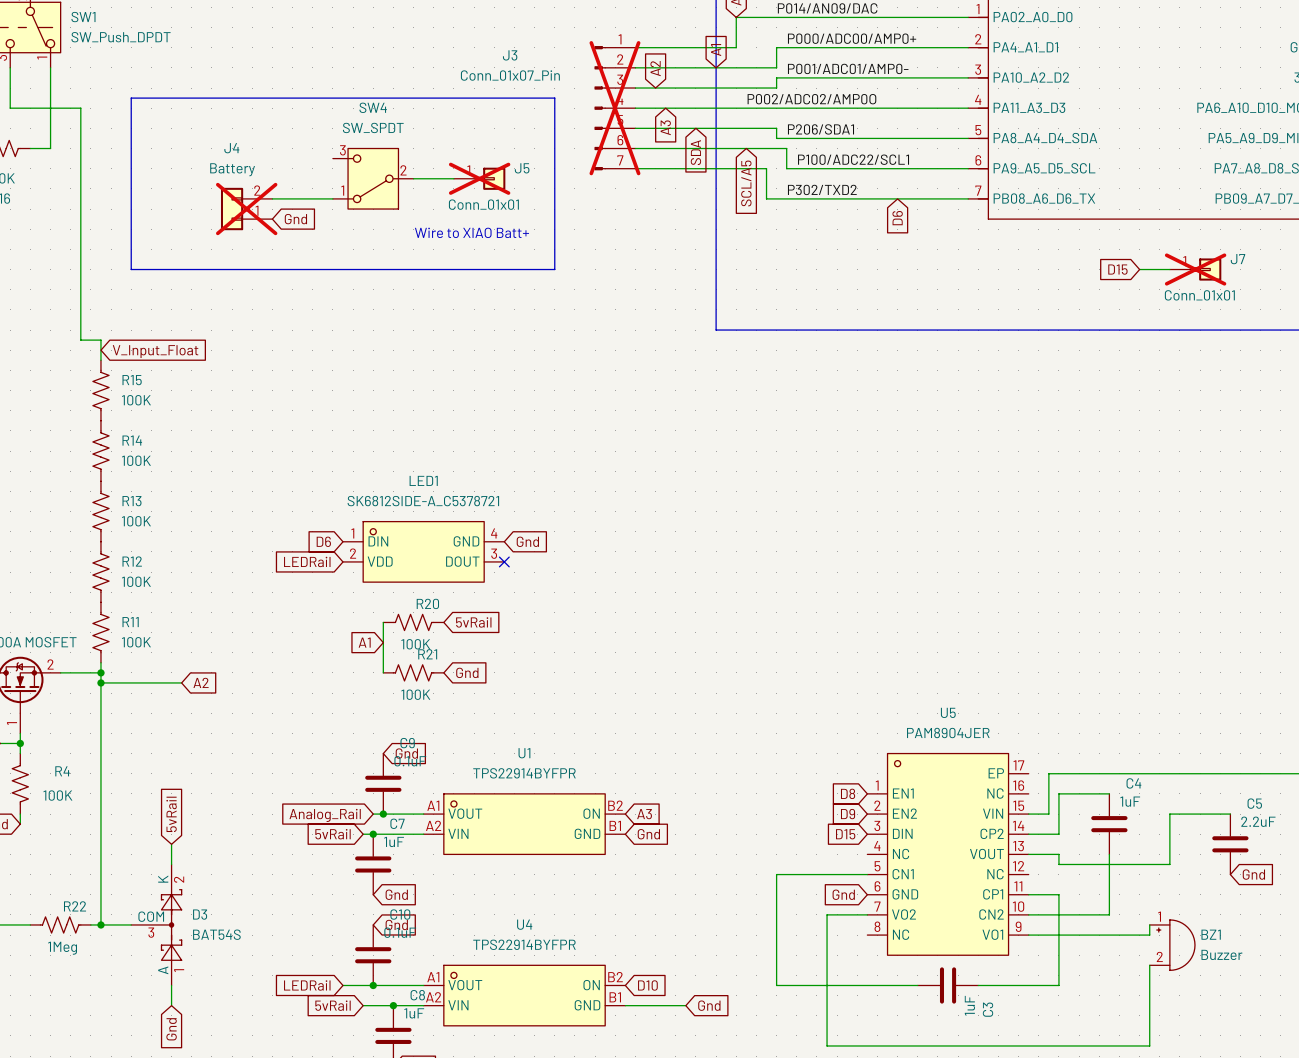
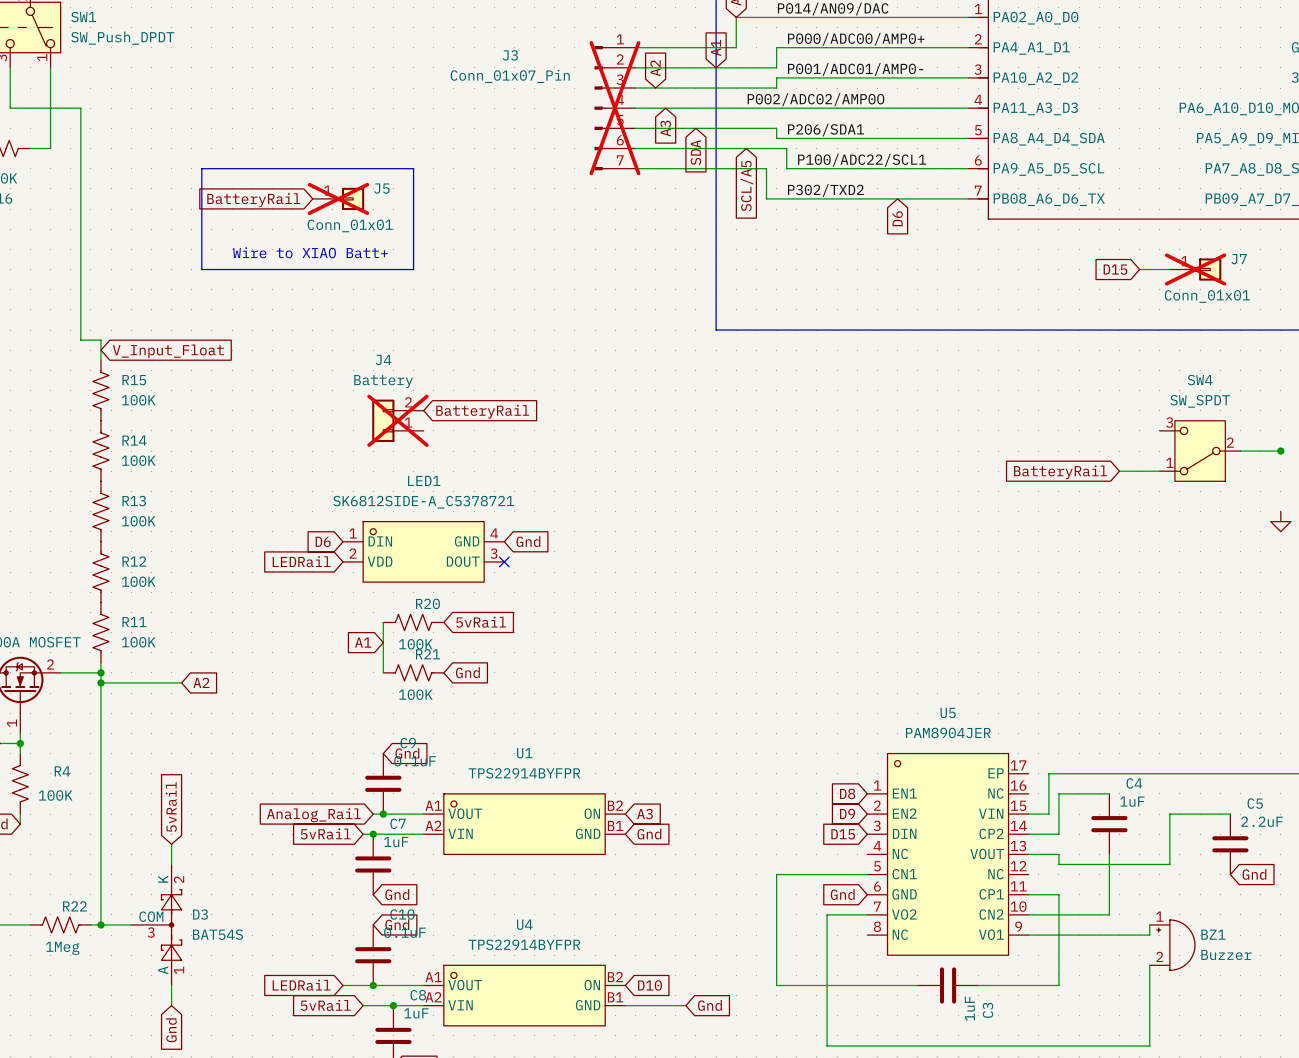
SW4 position: (373, 178) -> (1200, 451)
wire: (413, 178) (453, 178) -> none
J5 position: (479, 178) -> (338, 198)
wire: (272, 198) (332, 198) -> none
global label: none -> BatteryRail (253, 200)
J4 position: (246, 209) -> (397, 420)
global label: Gnd (295, 219) -> none
text position: Wire to XIAO Batt+ (471, 232) -> Wire to XIAO Batt+ (310, 252)
line: (201, 269) (131, 269) (131, 98) (554, 98) (554, 269) (413, 269) -> (201, 269) (201, 168) (413, 168) (413, 269)
global label: none -> BatteryRail (482, 411)
wire: none -> (1240, 451) (1280, 451)
junction: none -> (1280, 451)
wire: none -> (1119, 471) (1159, 471)
global label: none -> BatteryRail (1060, 472)
power symbol: none -> (1280, 521)

